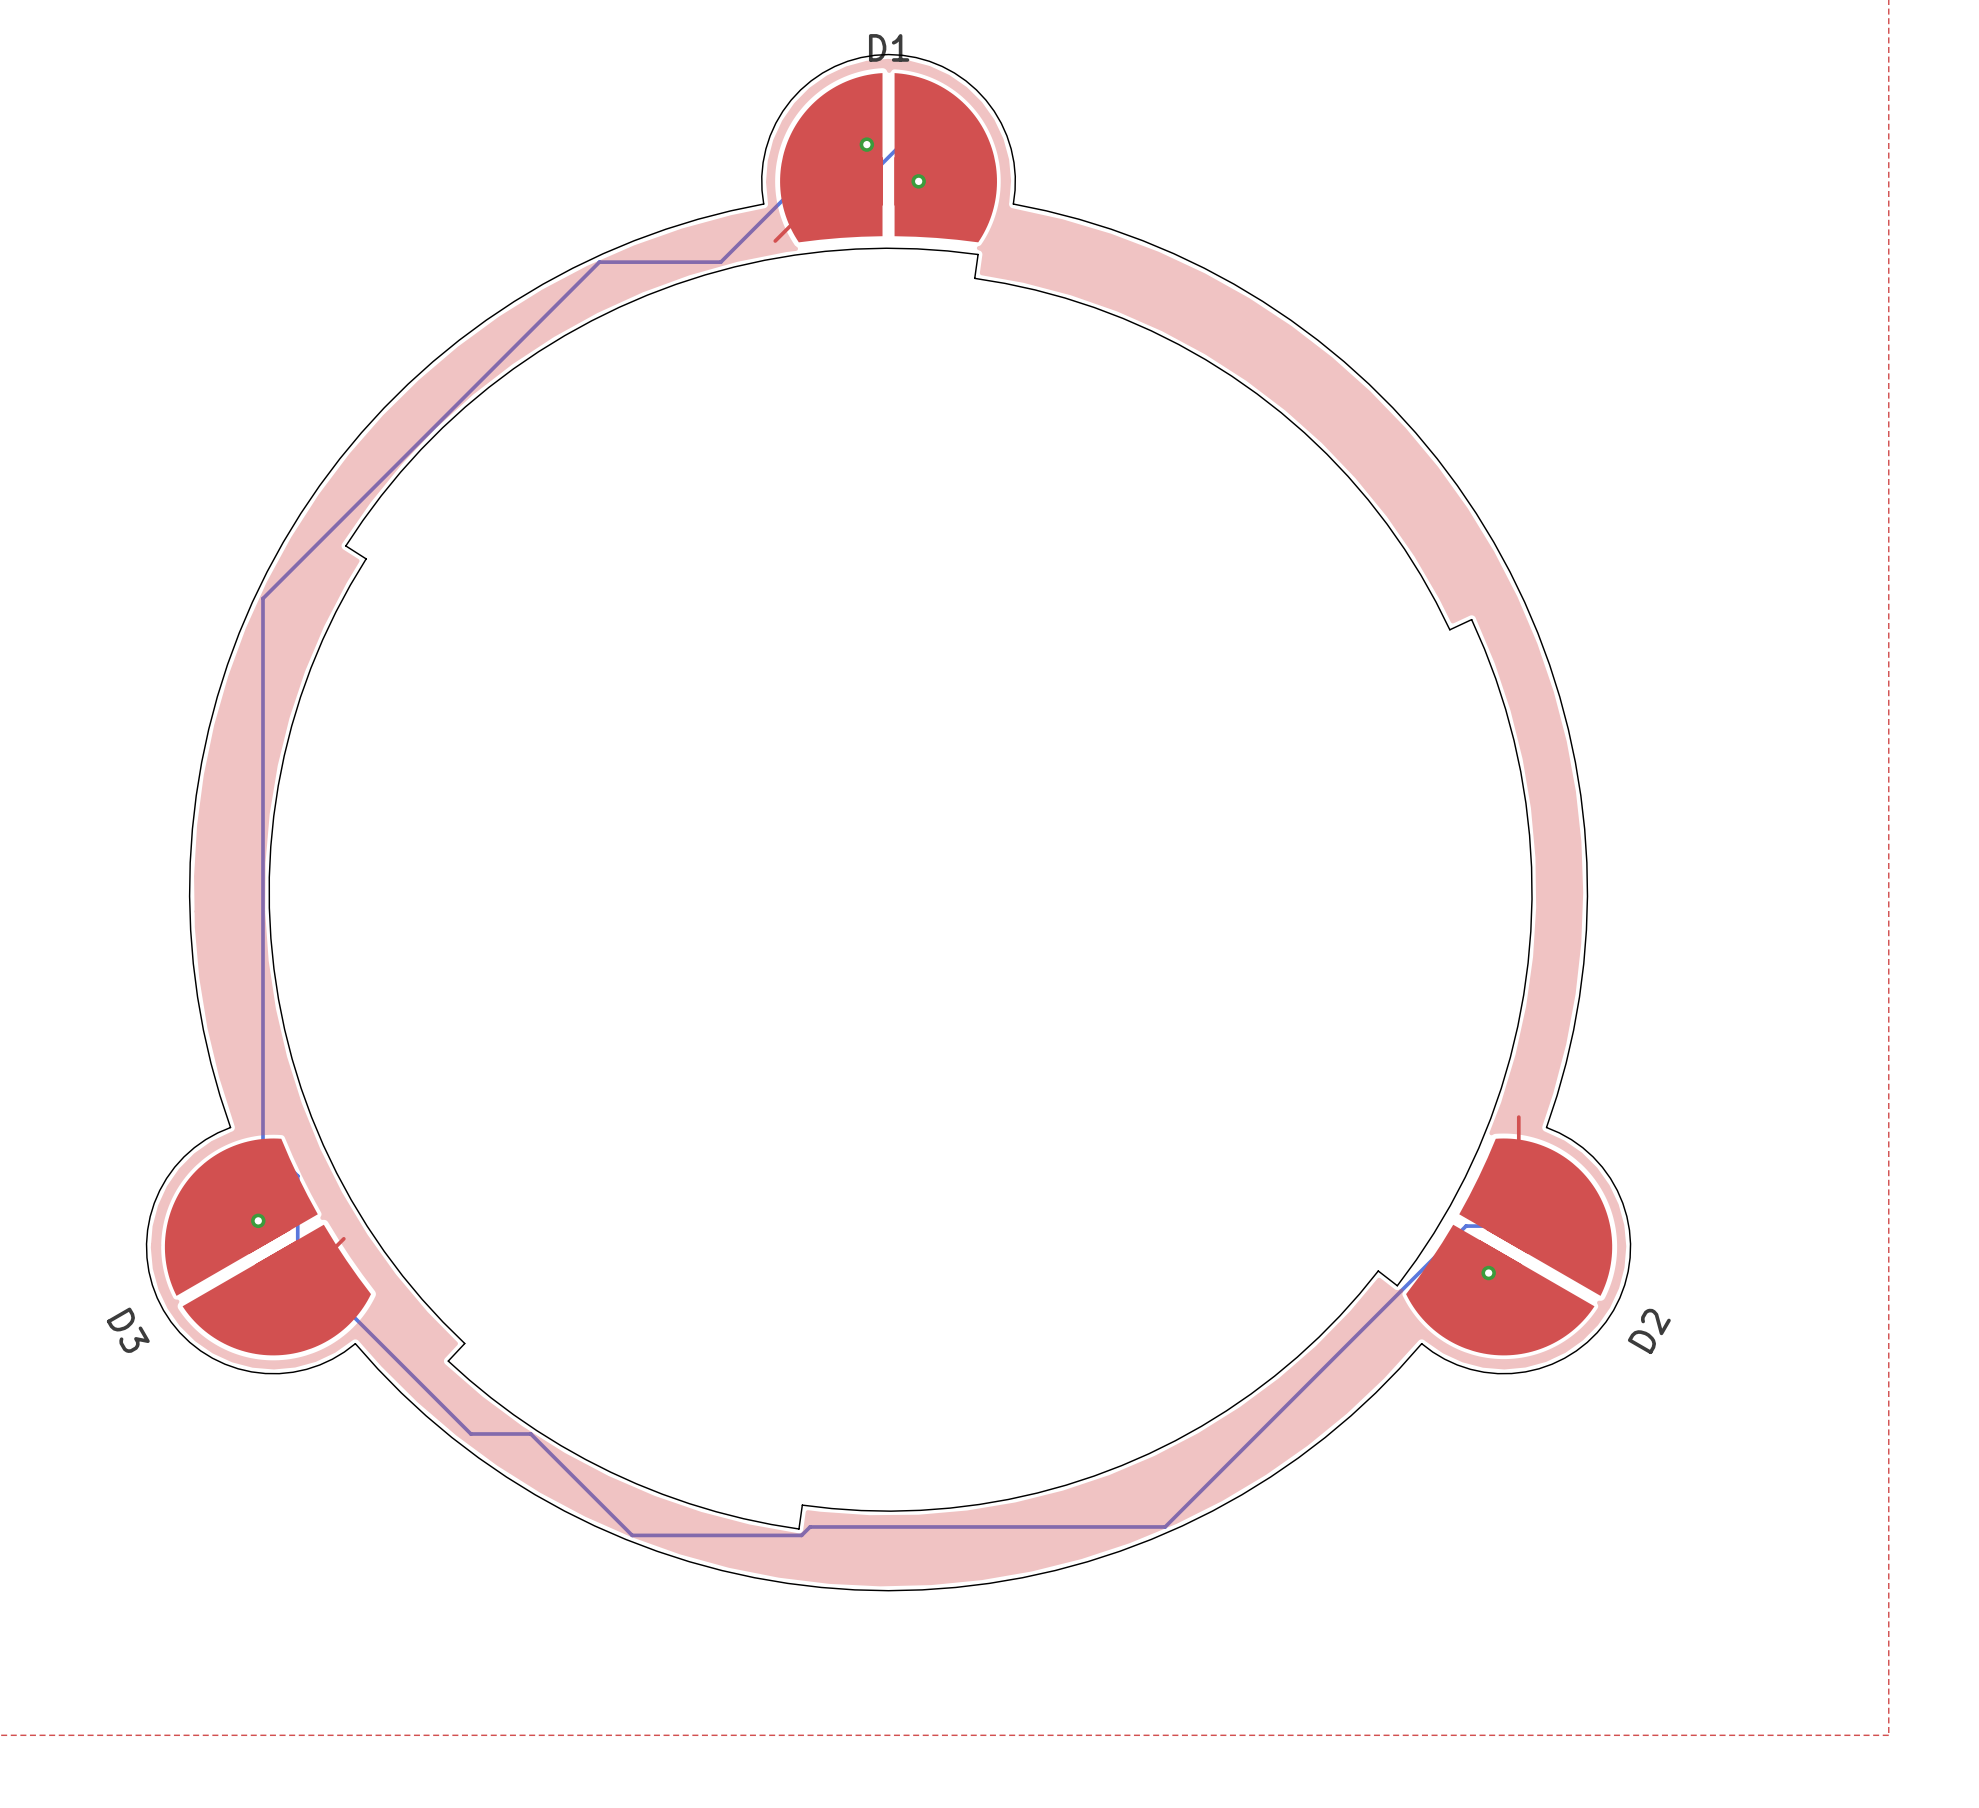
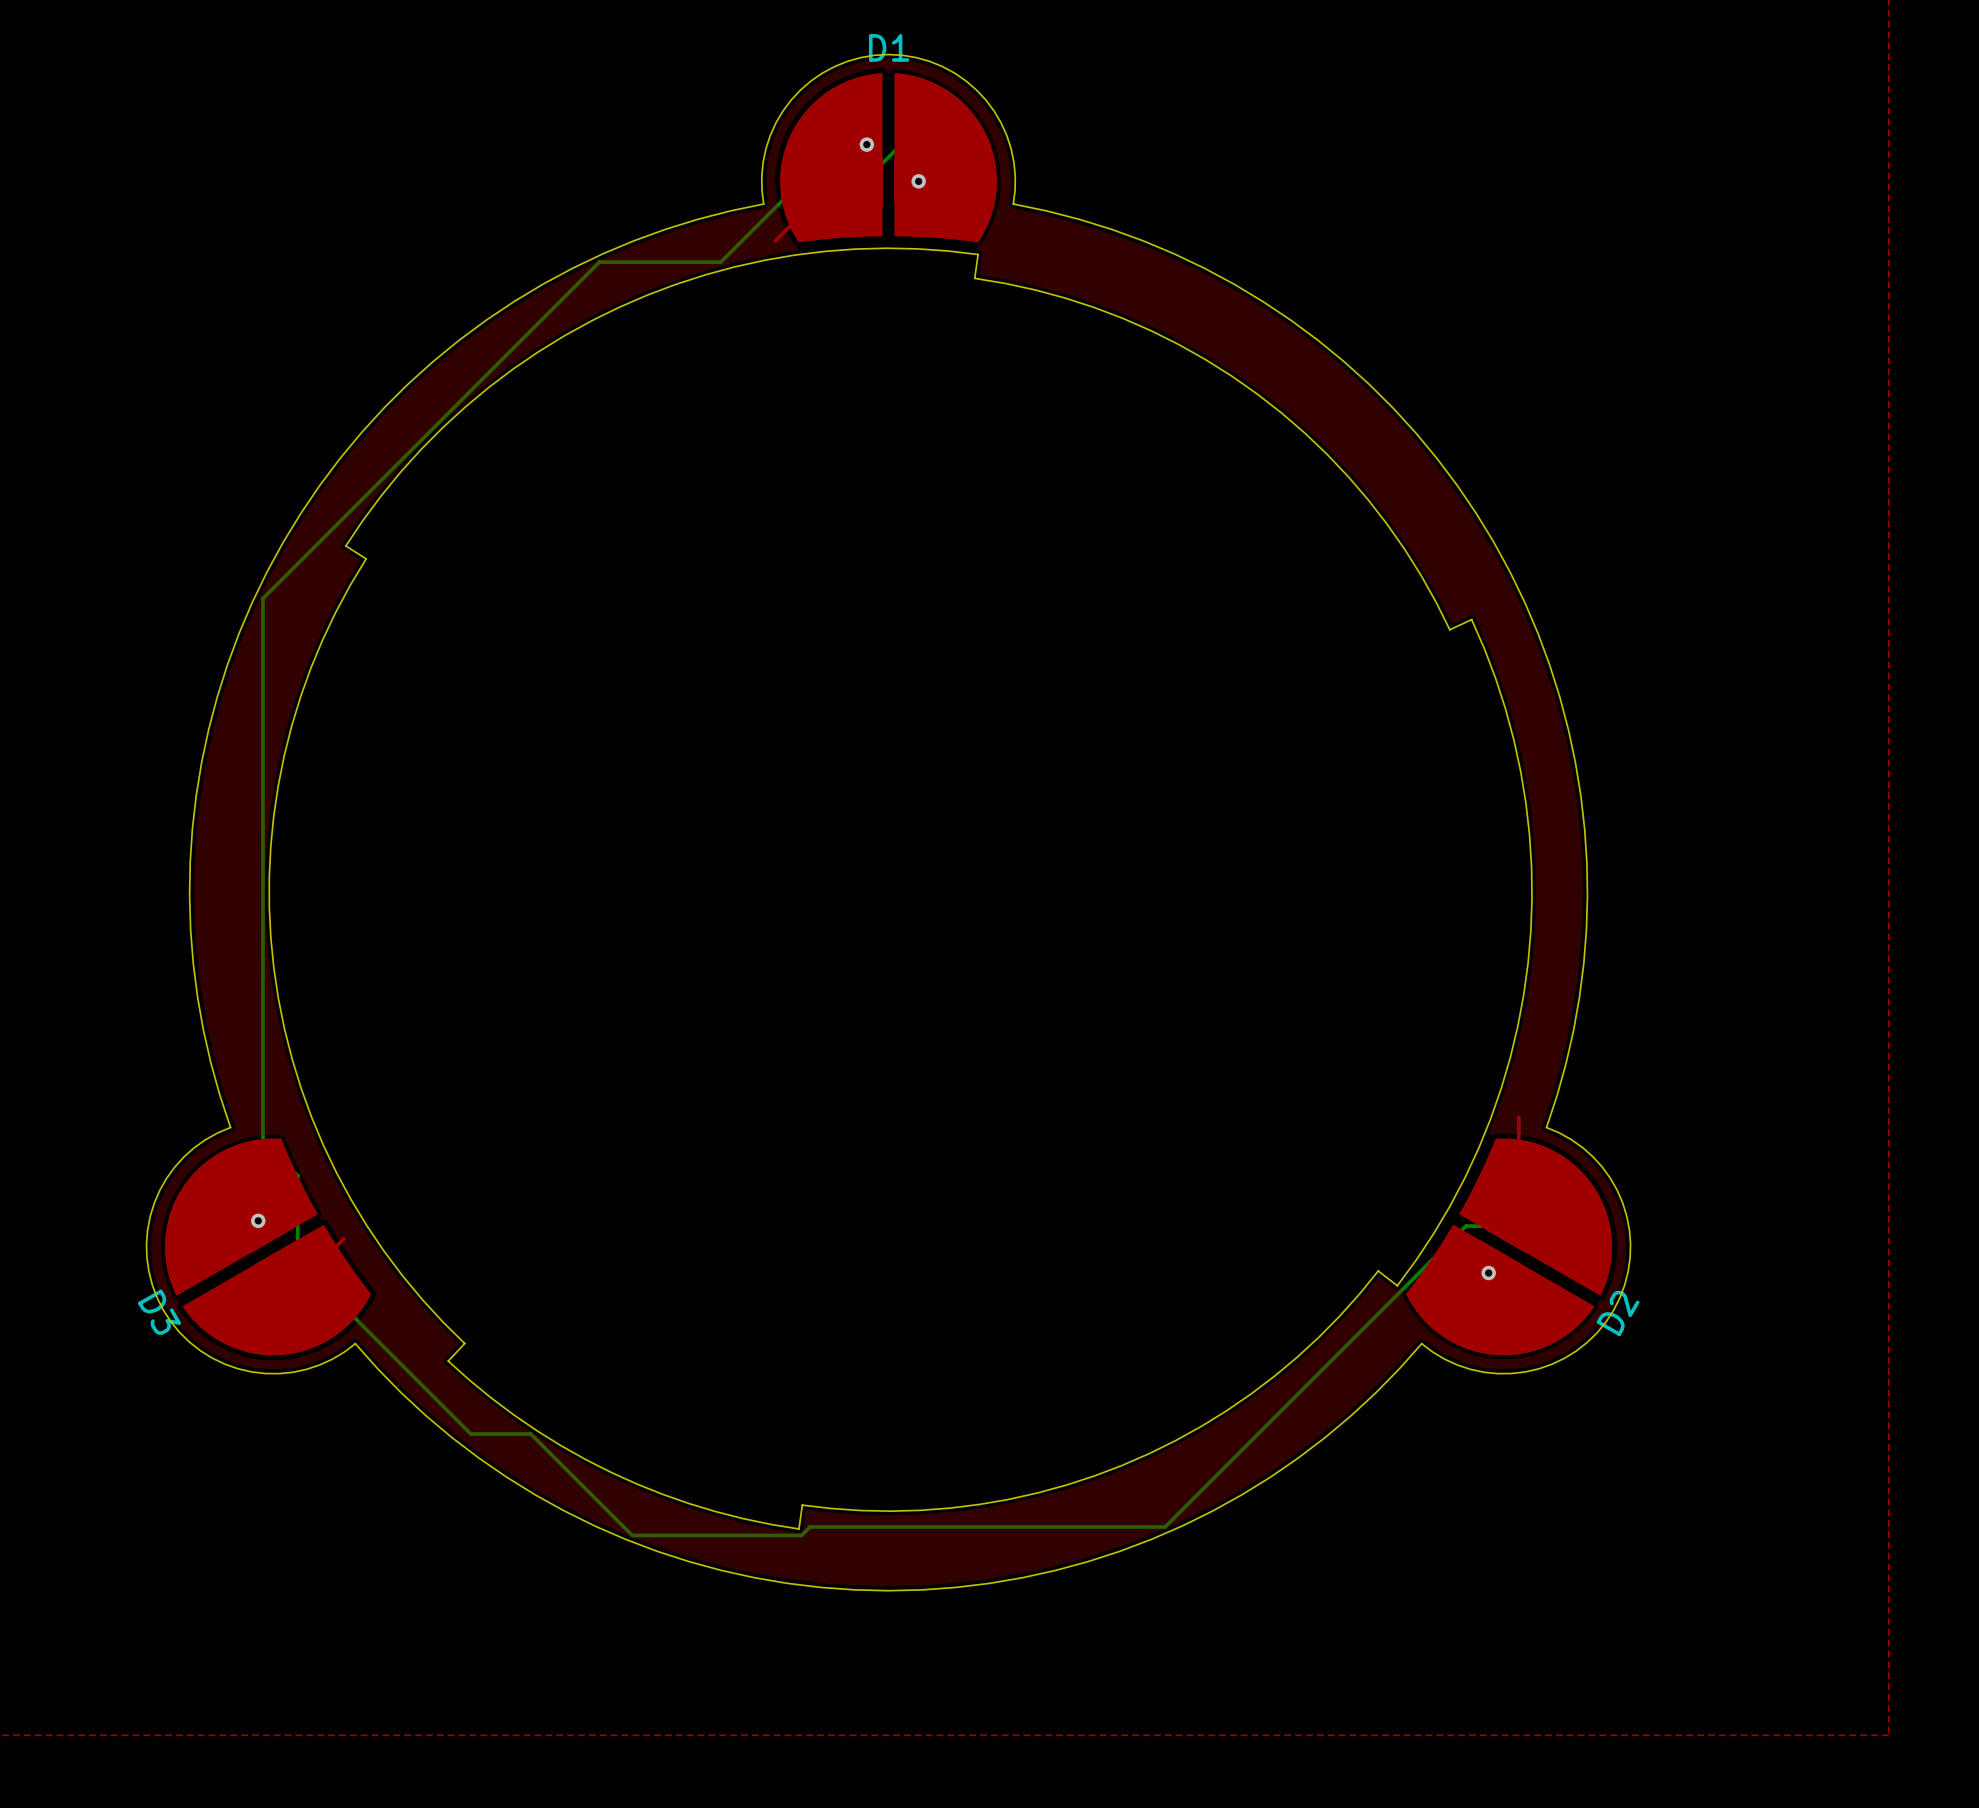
D3 name position: D3 (128, 1330) -> D3 (159, 1312)
D2 name position: D2 (1649, 1331) -> D2 (1618, 1313)

